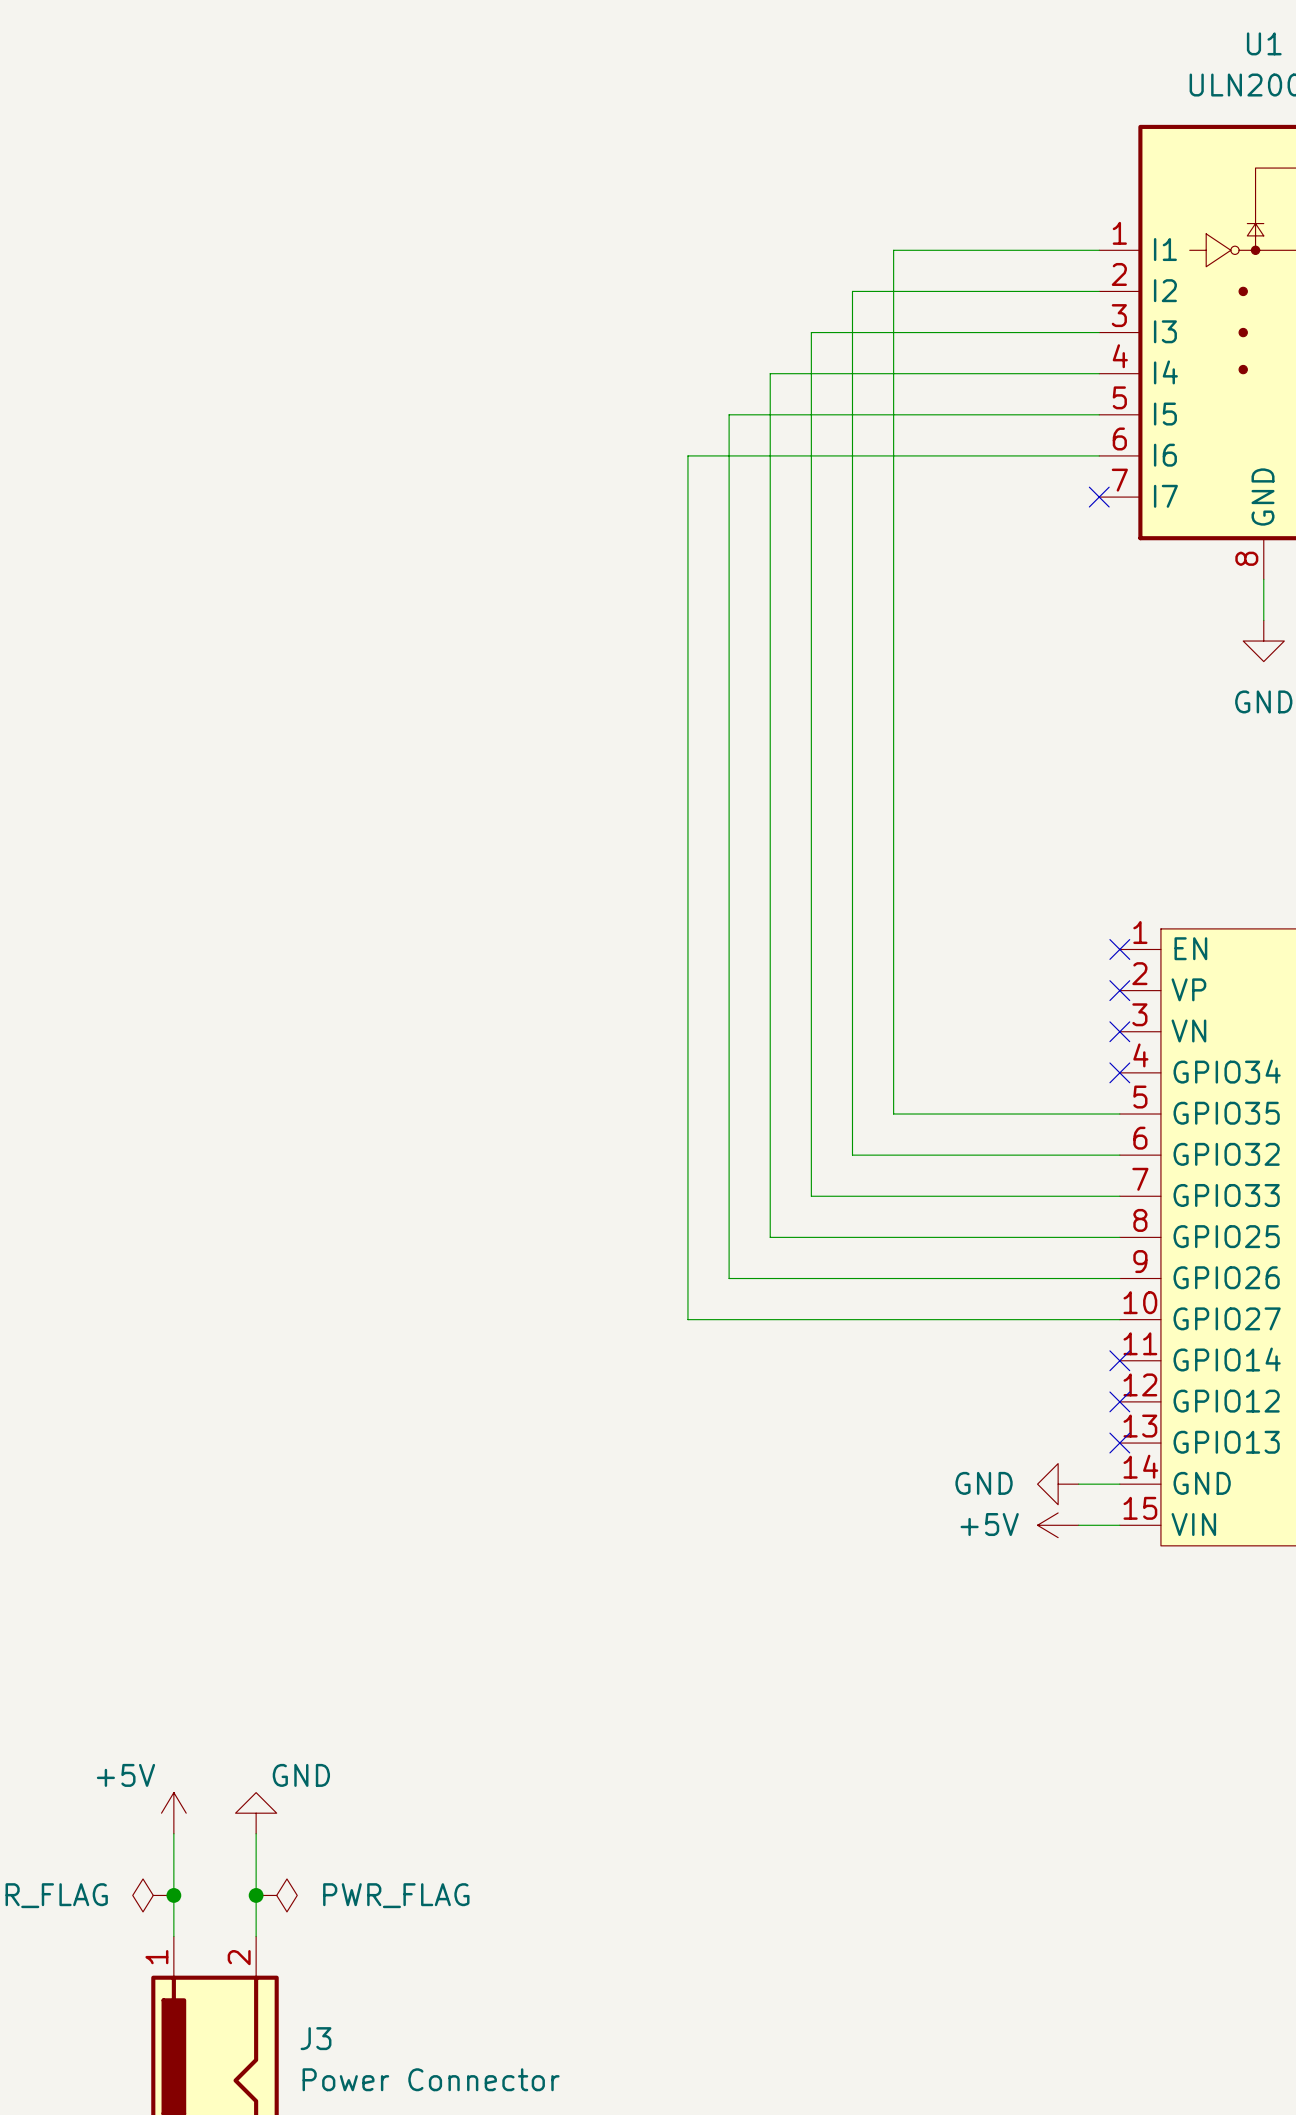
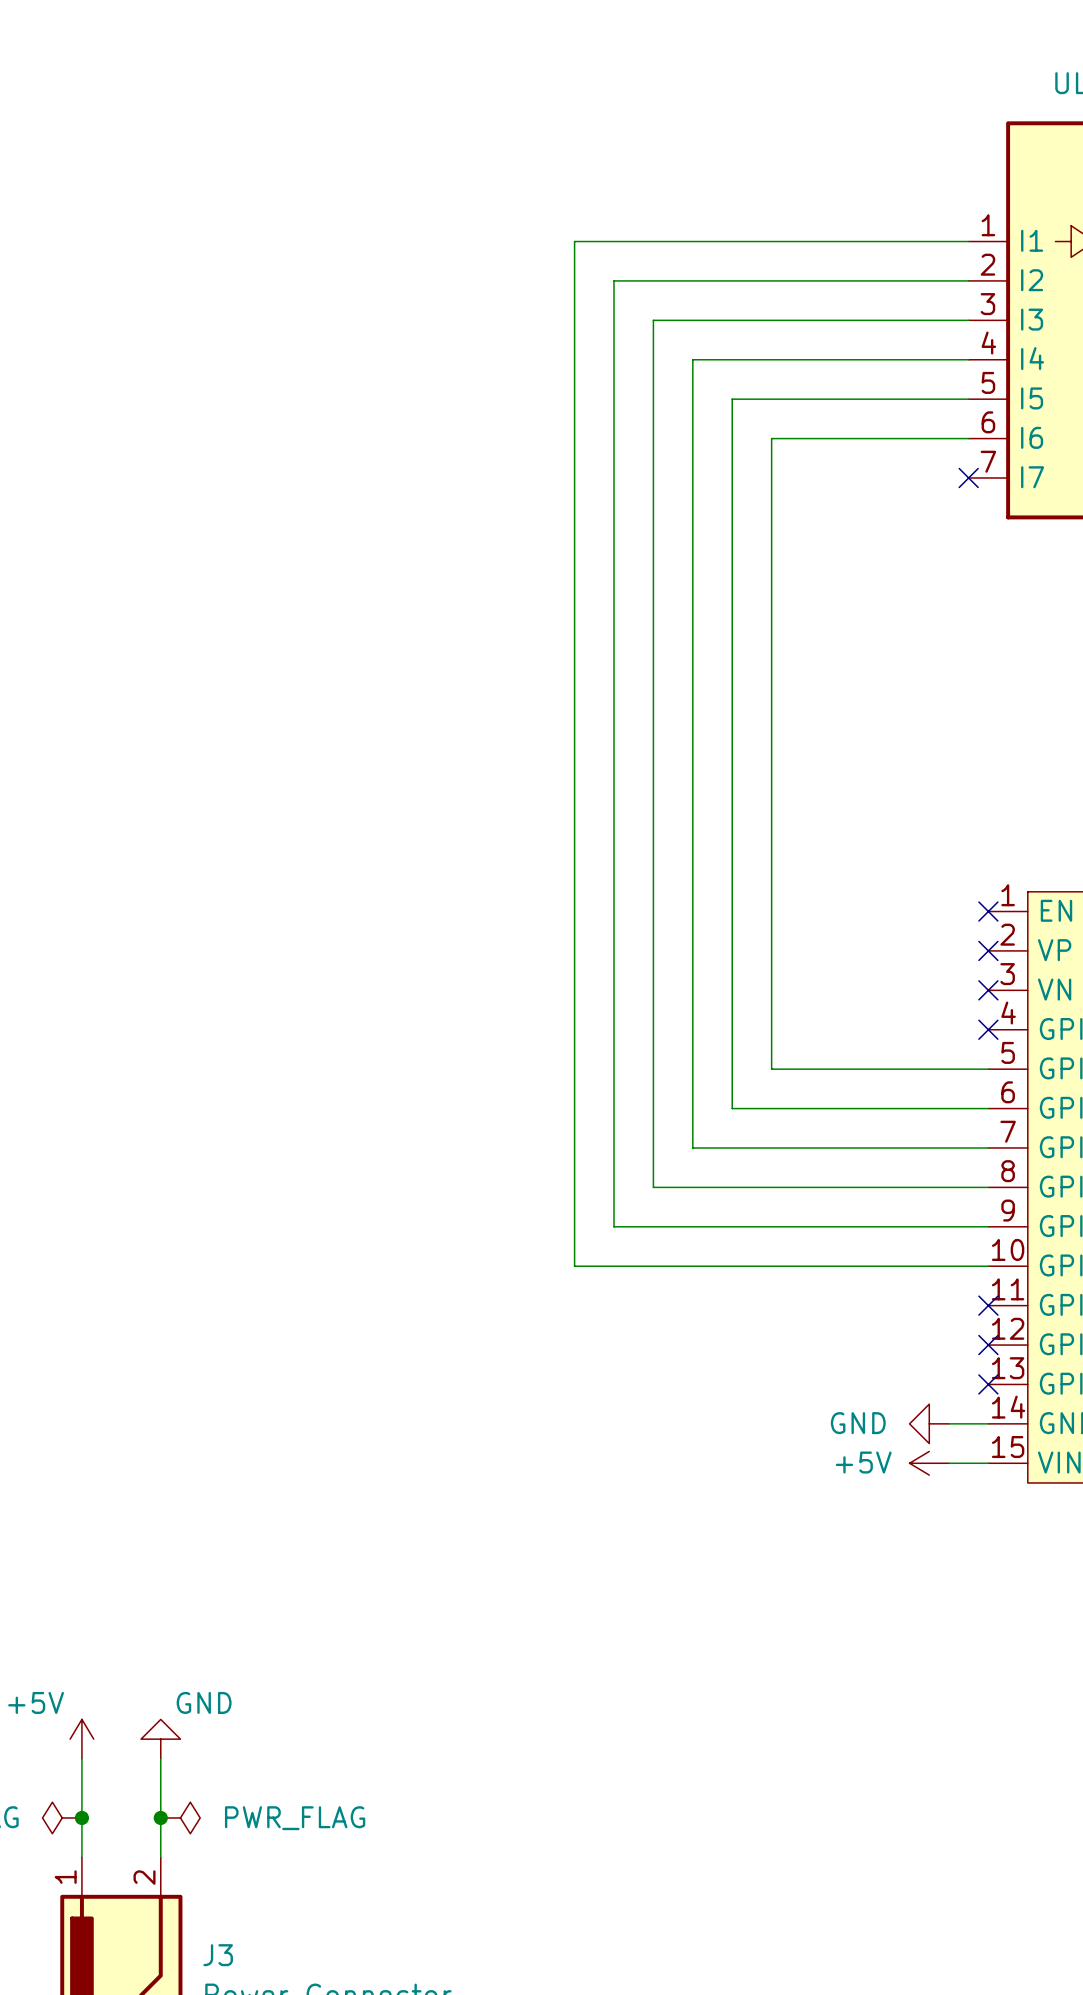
wire: (893, 250) (893, 455) (687, 455) -> (771, 241) (574, 241) (574, 438)
wire: (852, 291) (852, 414) (729, 414) -> (732, 280) (613, 280) (613, 399)
wire: (811, 332) (811, 373) (770, 373) -> (692, 320) (653, 320) (653, 359)

